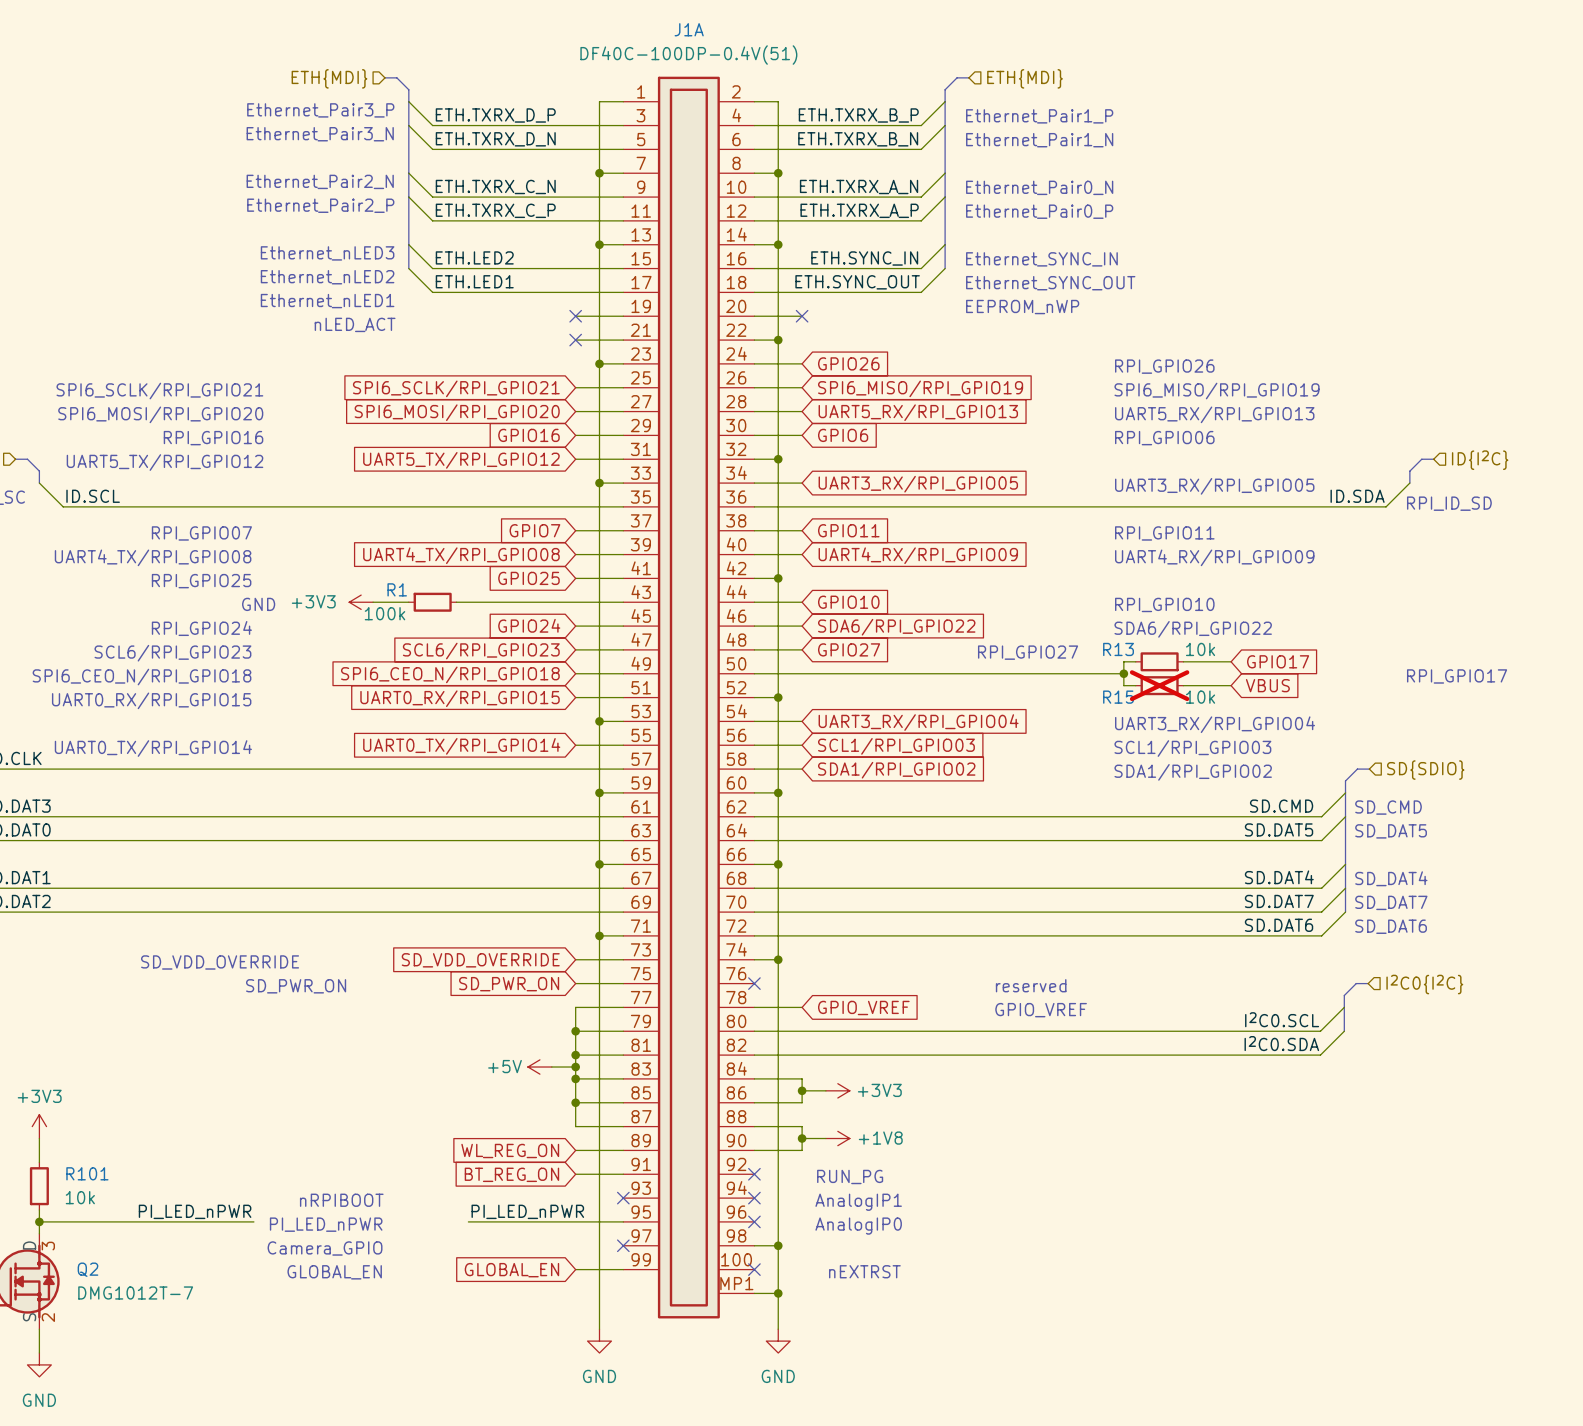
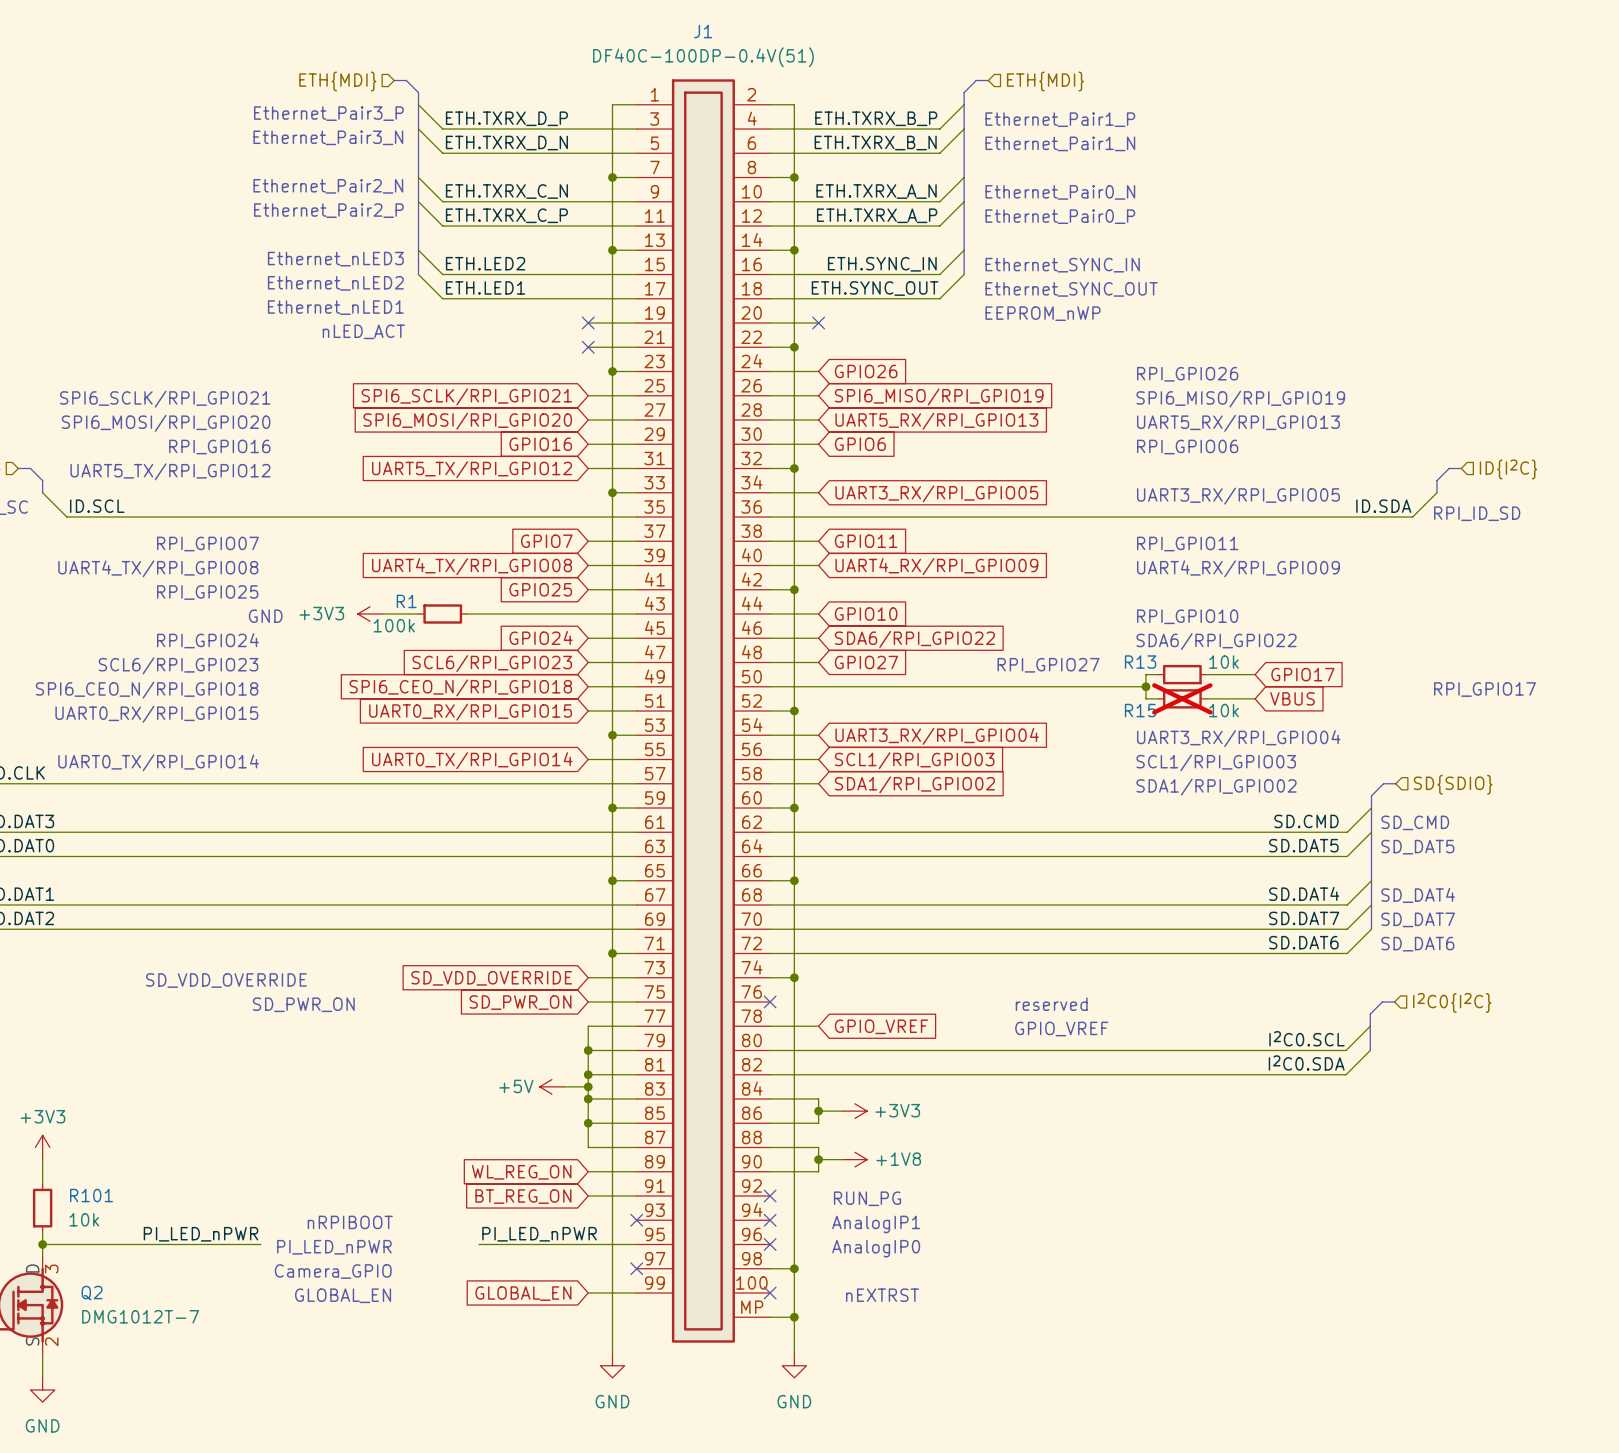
J1A name: J1A (689, 29) -> J1 (703, 31)
J1A pin number: MP1 (736, 1283) -> MP (752, 1307)

